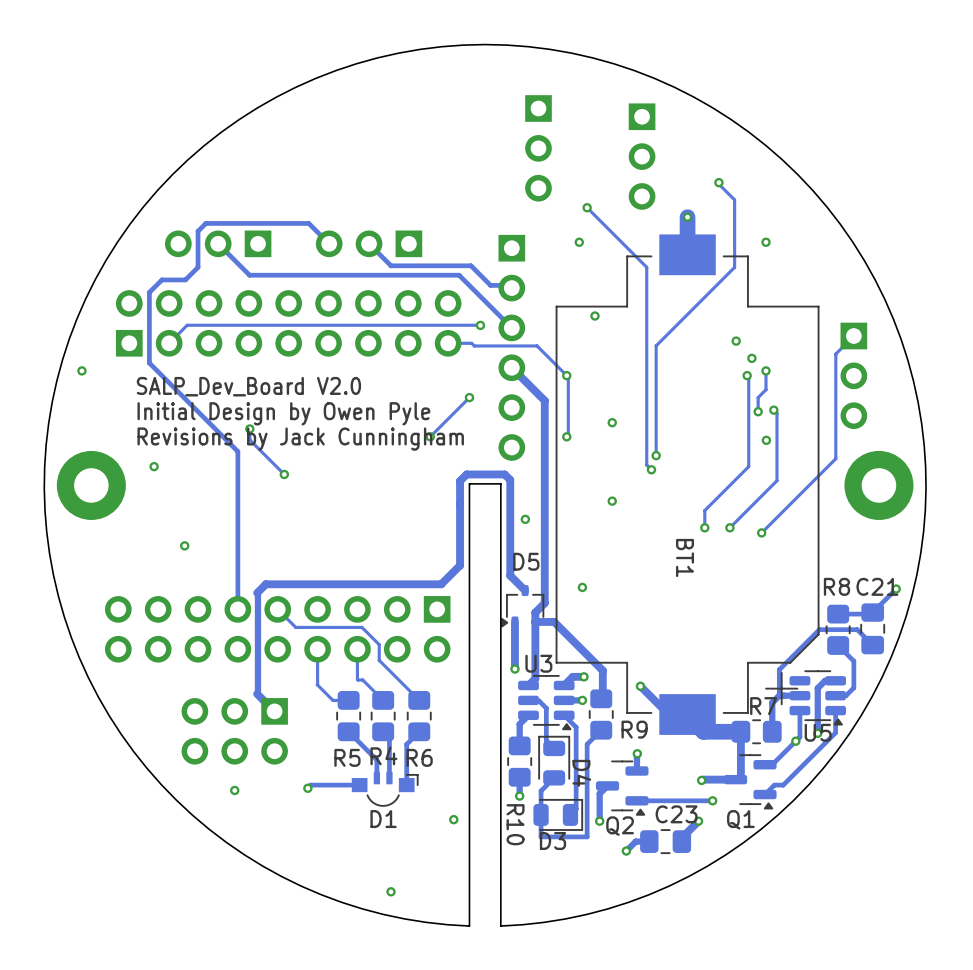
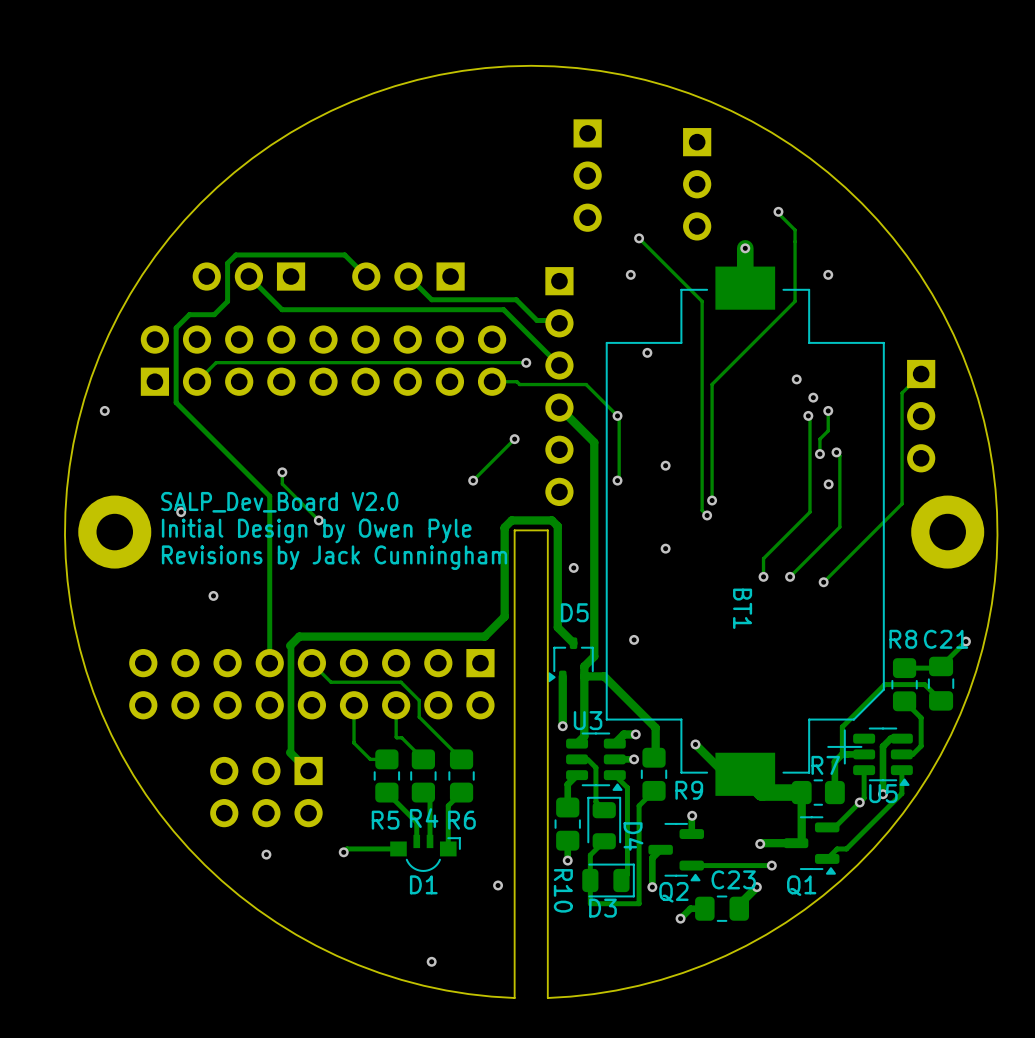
text position: SALP_Dev_Board V2.0 (248, 386) -> SALP_Dev_Board V2.0 (279, 502)
text position: Initial Design by Owen Pyle (283, 413) -> Initial Design by Owen Pyle (316, 530)
text position: Revisions by Jack Cunningham (300, 439) -> Revisions by Jack Cunningham (334, 557)

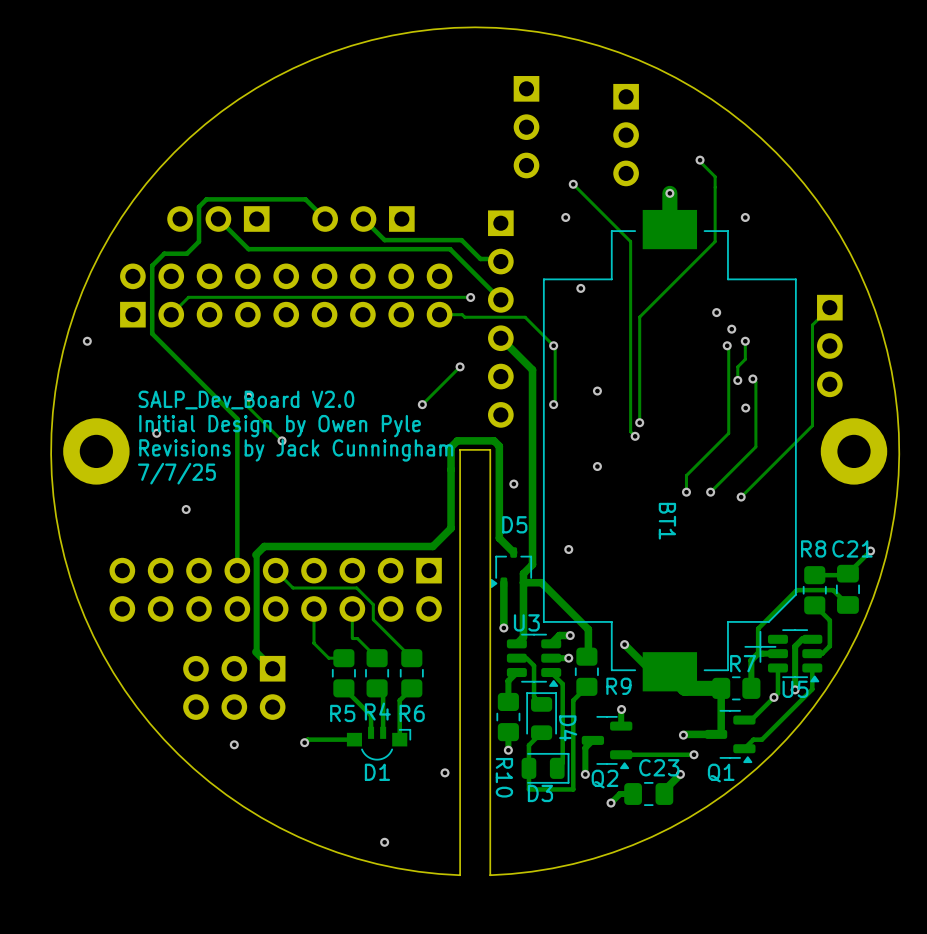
text: none -> SALP_Dev_Board V2.0 (246, 400)
text: SALP_Dev_Board V2.0 (279, 502) -> Initial Design by Owen Pyle (280, 426)
text: Initial Design by Owen Pyle (316, 530) -> Revisions by Jack Cunningham (296, 450)
text: Revisions by Jack Cunningham (334, 557) -> 7/7/25 (176, 473)

